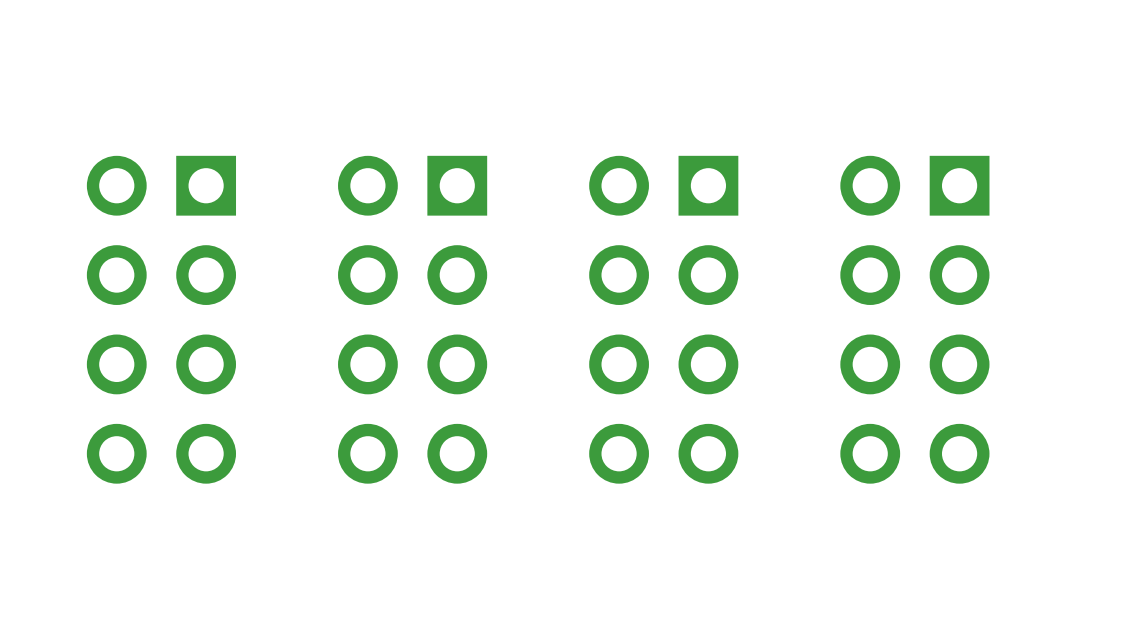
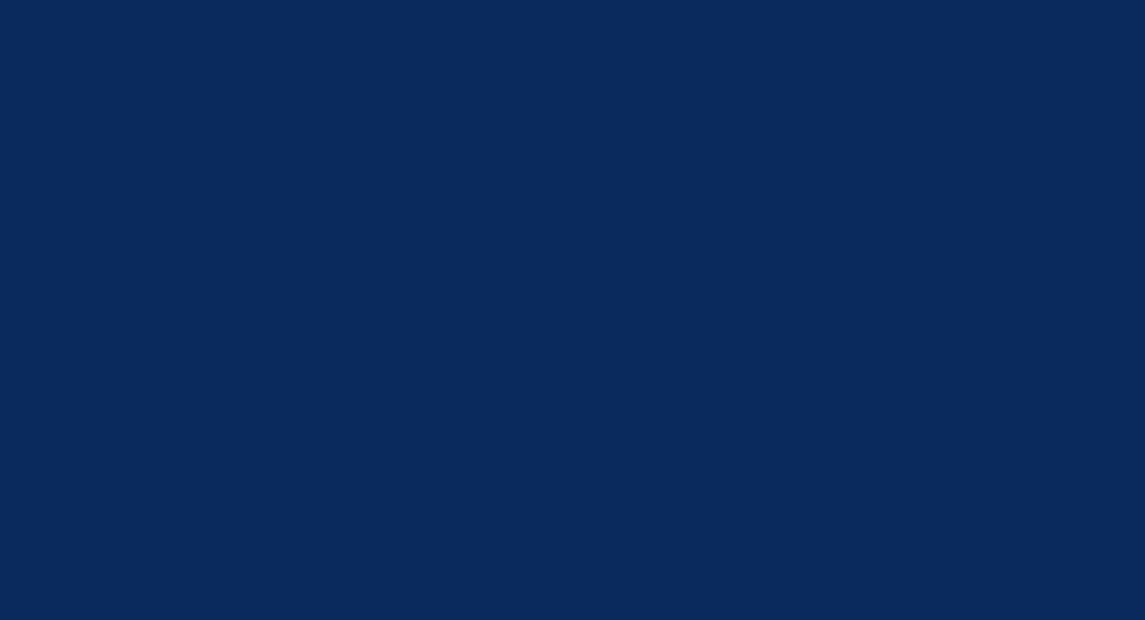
part: (161, 319) -> none
part: (412, 319) -> none
part: (663, 319) -> none
part: (914, 319) -> none

